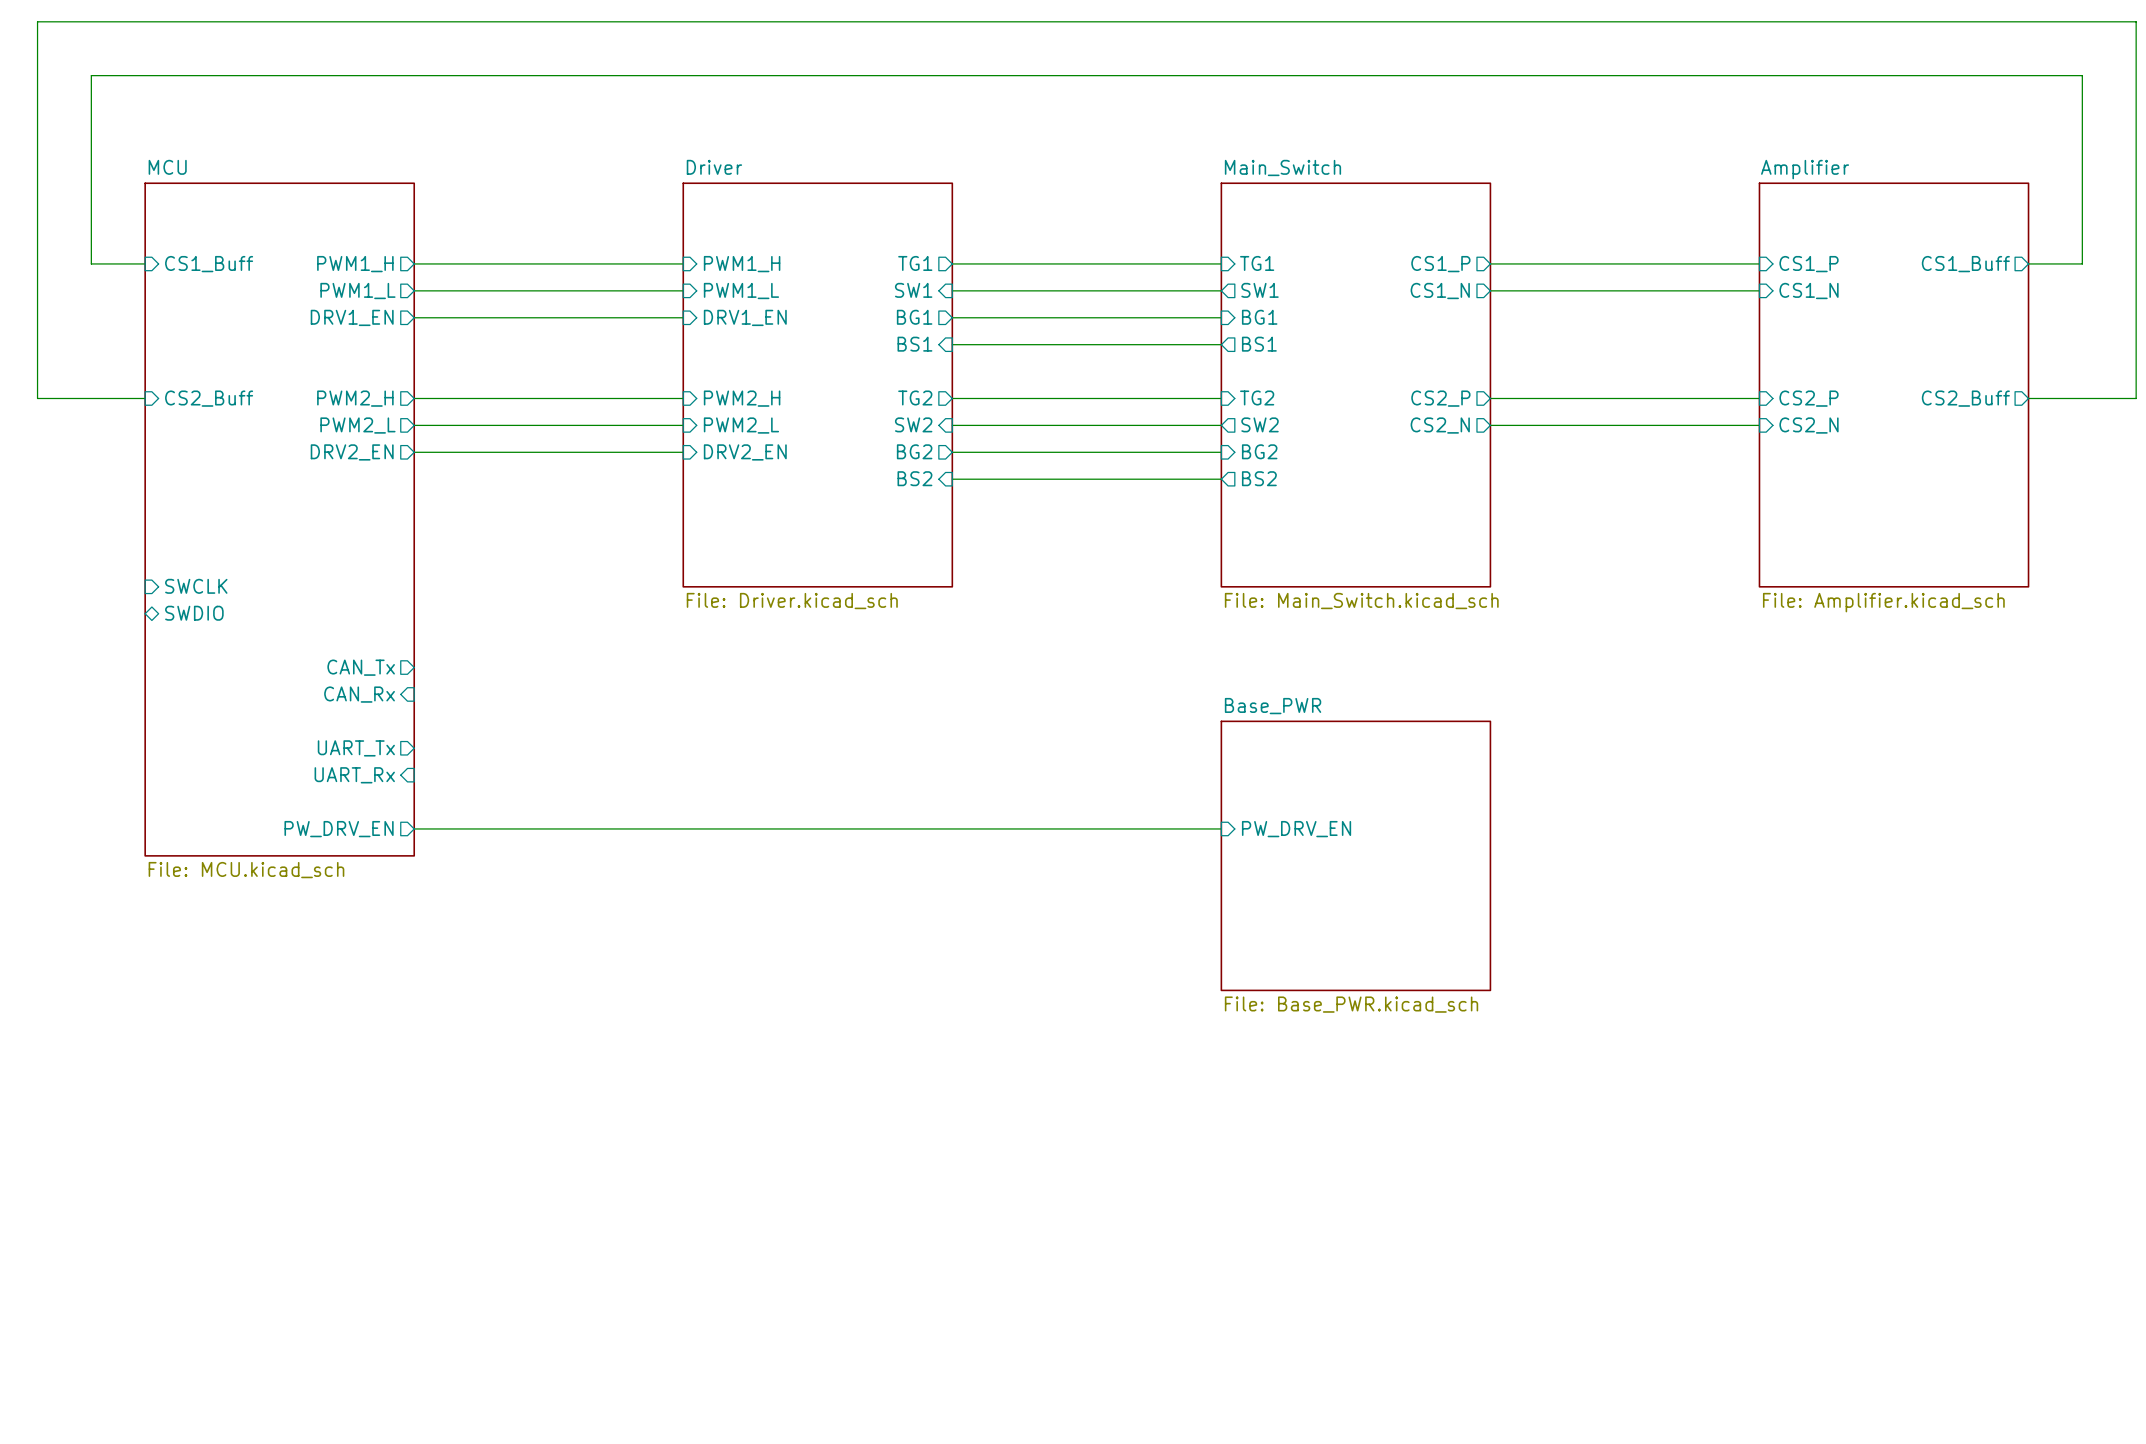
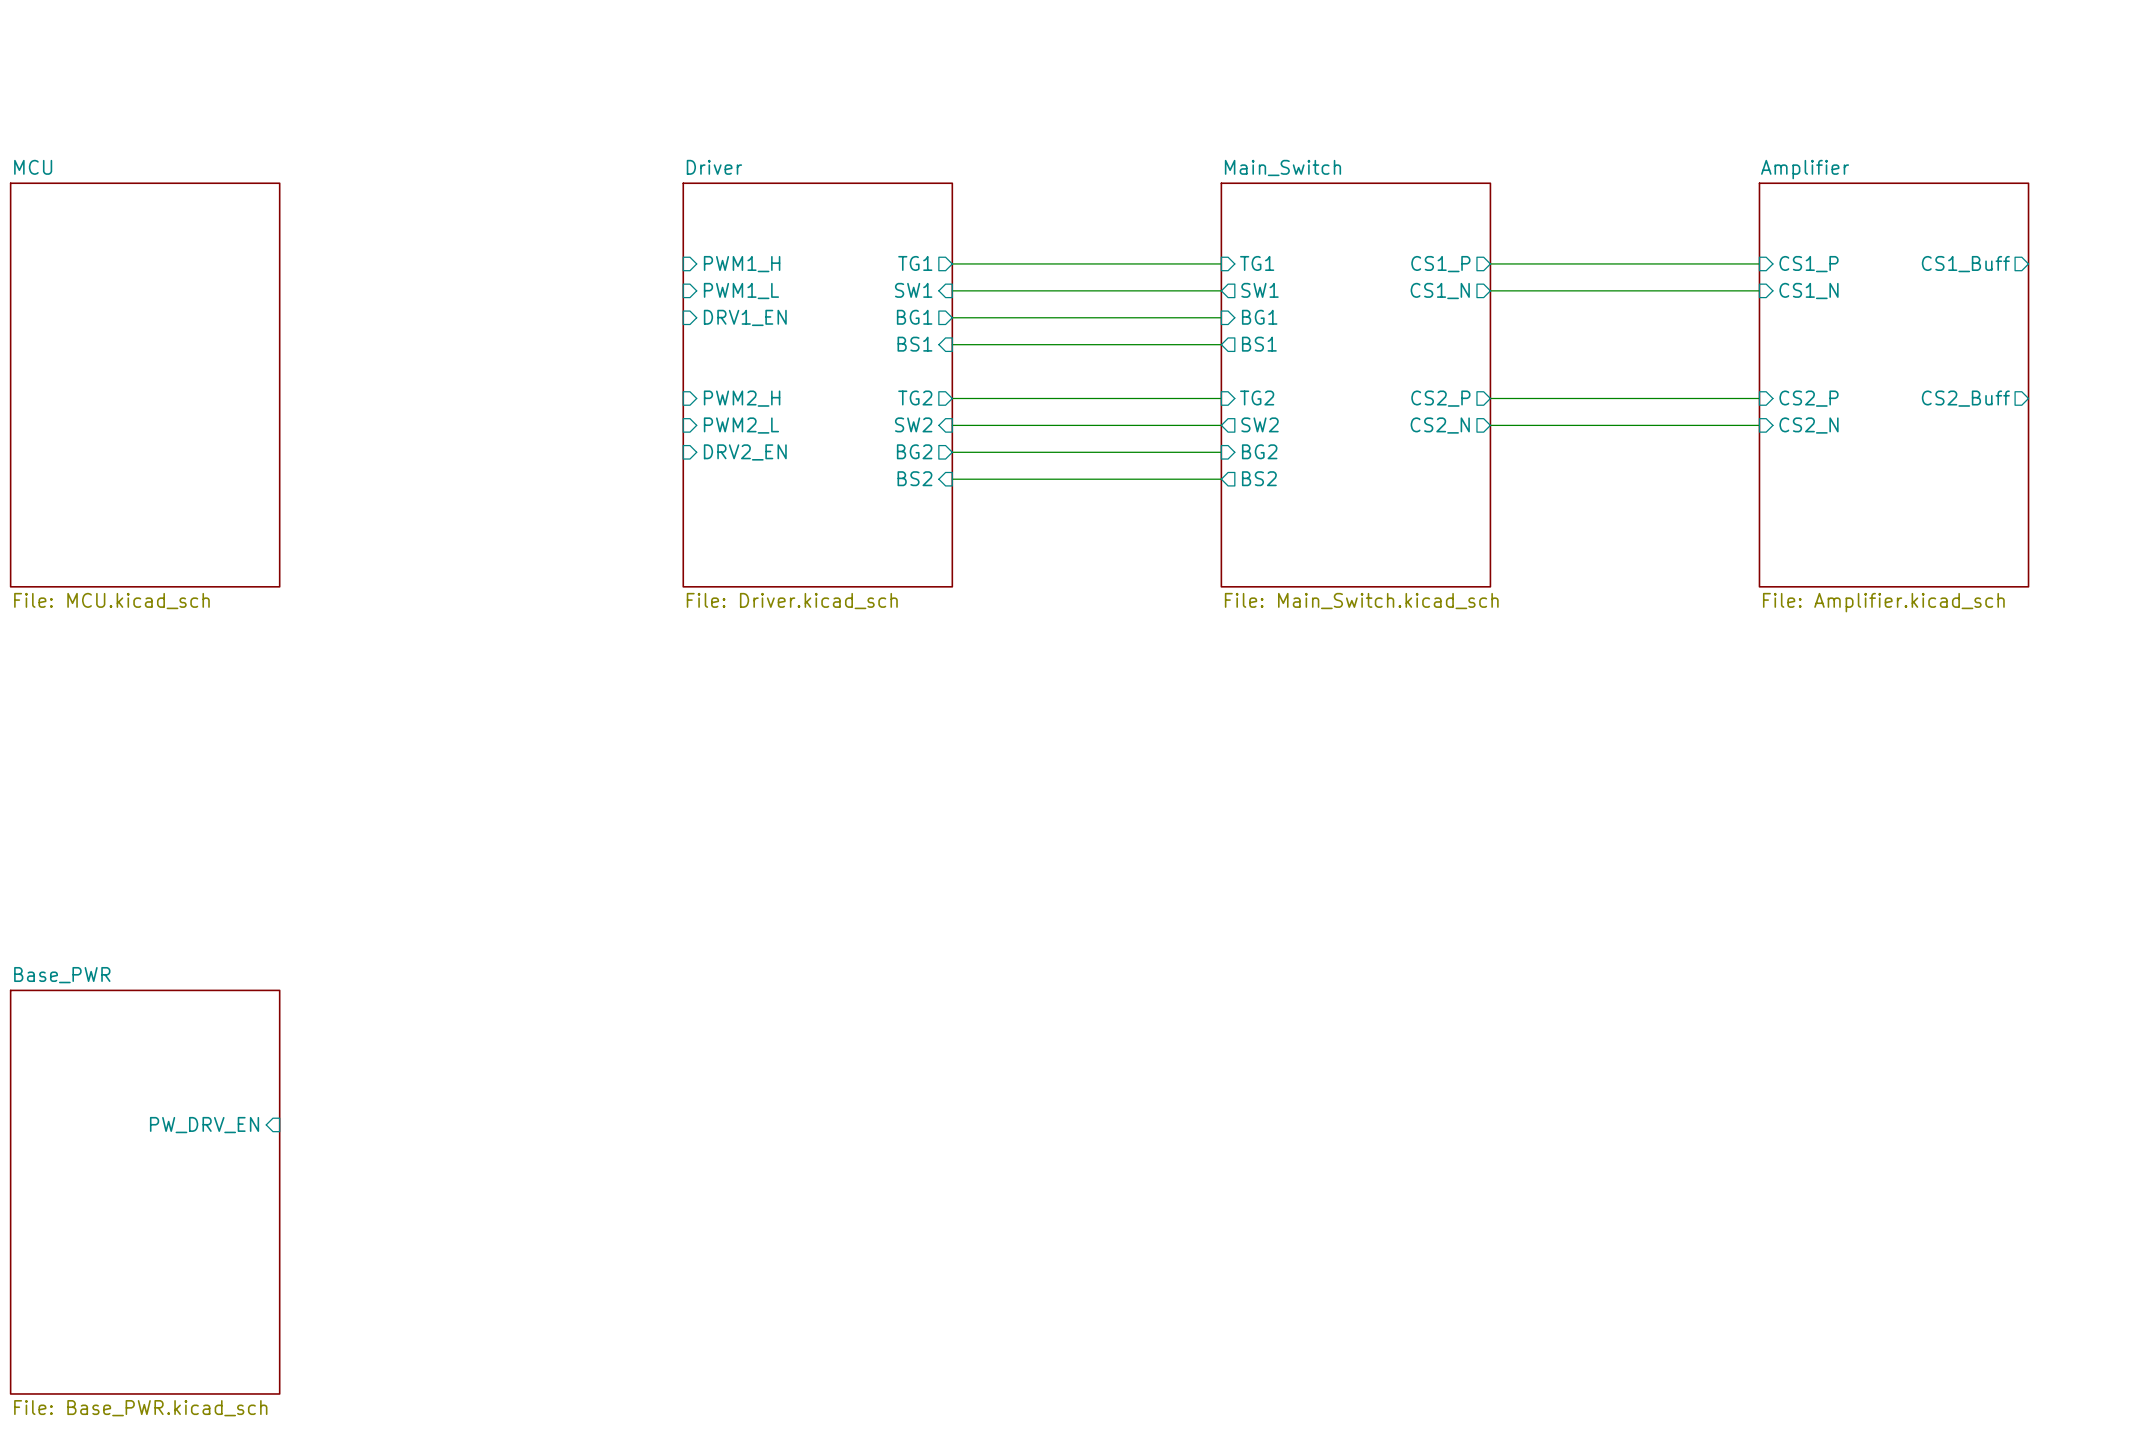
wire: (145, 263) (91, 263) (91, 75) (2082, 75) (2082, 263) (2028, 263) -> none
wire: (414, 263) (683, 263) -> none
sheet pin: CS1_Buff (209, 264) -> none
sheet pin: PWM1_H (355, 264) -> none
wire: (414, 290) (683, 290) -> none
sheet pin: PWM1_L (357, 291) -> none
sheet pin: DRV1_EN (352, 317) -> none
wire: (414, 317) (683, 317) -> none
sheet MCU: none -> File: MCU.kicad_sch (145, 385)
wire: (145, 398) (37, 398) (37, 21) (2136, 21) (2136, 398) (2028, 398) -> none
sheet pin: CS2_Buff (209, 398) -> none
sheet pin: PWM2_H (355, 398) -> none
wire: (414, 398) (683, 398) -> none
sheet pin: PWM2_L (357, 425) -> none
wire: (414, 425) (683, 425) -> none
sheet pin: DRV2_EN (352, 452) -> none
wire: (414, 452) (683, 452) -> none
sheet MCU: File: MCU.kicad_sch (279, 519) -> none
sheet pin: SWCLK (196, 586) -> none
sheet pin: SWDIO (194, 613) -> none
sheet pin: CAN_Tx (361, 667) -> none
sheet pin: CAN_Rx (359, 694) -> none
sheet pin: UART_Tx (356, 748) -> none
sheet pin: UART_Rx (354, 775) -> none
wire: (414, 828) (1221, 828) -> none
sheet pin: PW_DRV_EN (339, 829) -> none
sheet pin: PW_DRV_EN (1296, 829) -> none
sheet Base_PWR: File: Base_PWR.kicad_sch (1355, 855) -> none
sheet pin: none -> PW_DRV_EN (204, 1125)
sheet Base_PWR: none -> File: Base_PWR.kicad_sch (145, 1192)

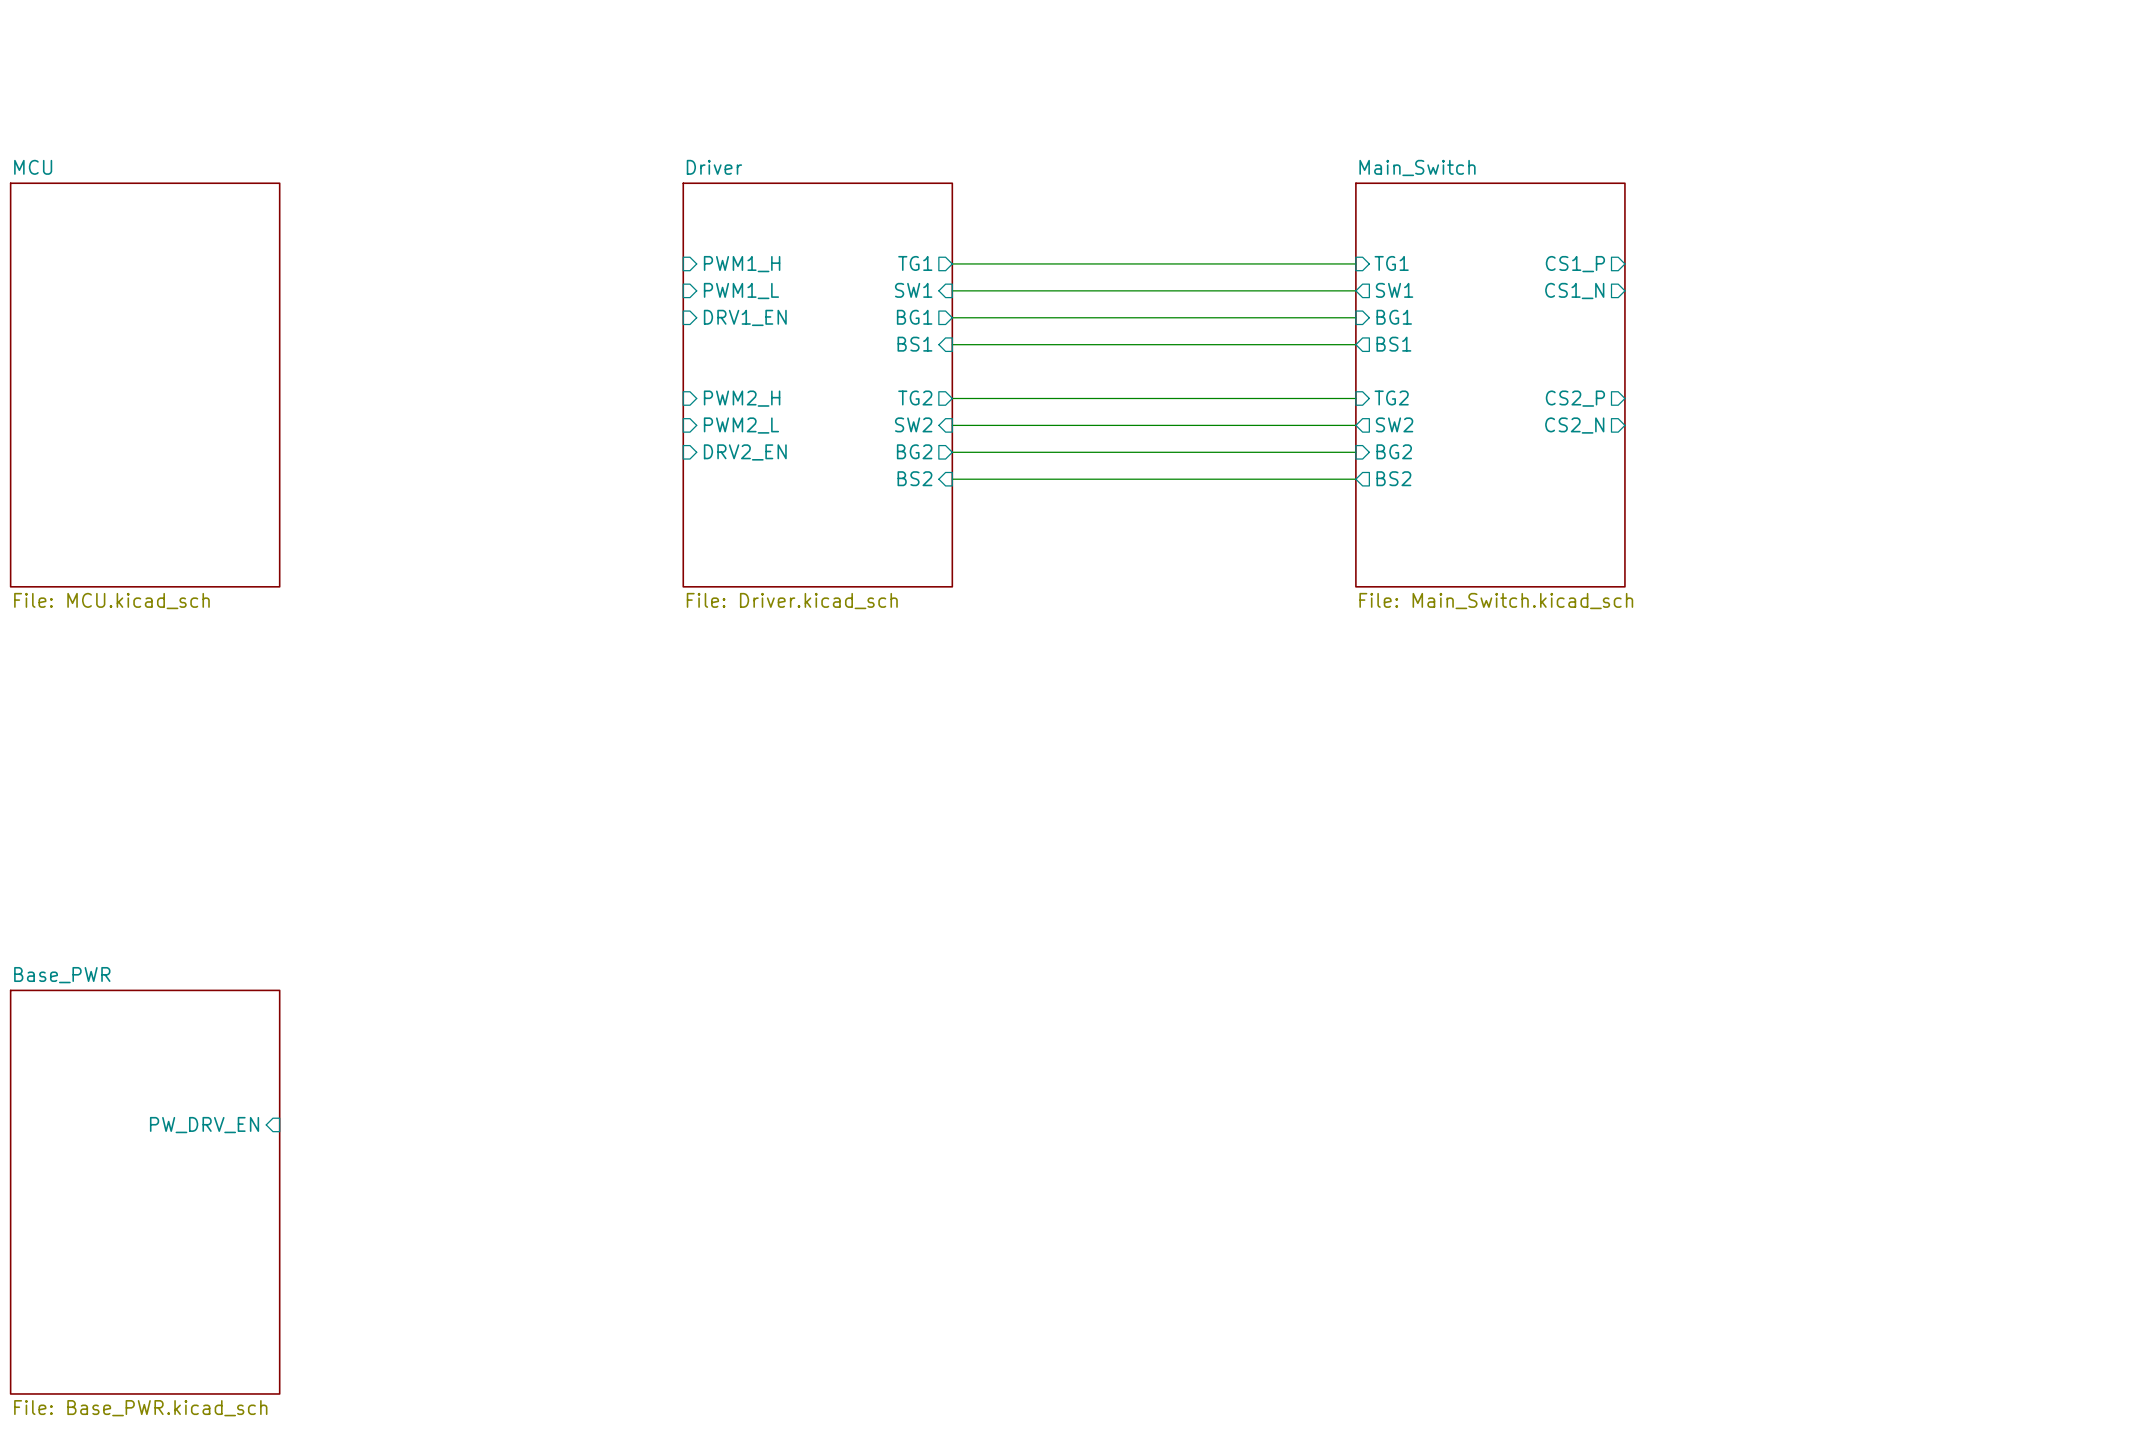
wire: none -> (1221, 263) (1355, 263)
sheet pin position: TG1 (1257, 263) -> TG1 (1391, 263)
wire: (1490, 263) (1759, 263) -> none
sheet pin: CS1_P (1440, 264) -> none
sheet pin: none -> CS1_P (1575, 264)
sheet pin: CS1_P (1809, 264) -> none
sheet pin: CS1_Buff (1965, 264) -> none
wire: none -> (1221, 290) (1355, 290)
sheet pin position: SW1 (1260, 290) -> SW1 (1394, 290)
wire: (1490, 290) (1759, 290) -> none
sheet pin: CS1_N (1440, 291) -> none
sheet pin: none -> CS1_N (1574, 291)
sheet pin: CS1_N (1809, 291) -> none
wire: none -> (1221, 317) (1355, 317)
sheet pin position: BG1 (1259, 317) -> BG1 (1394, 317)
wire: none -> (1221, 344) (1355, 344)
sheet pin position: BS1 (1259, 344) -> BS1 (1393, 344)
sheet Main_Switch position: (1355, 385) -> (1490, 385)
sheet Amplifier: File: Amplifier.kicad_sch (1894, 385) -> none
sheet pin position: TG2 (1257, 397) -> TG2 (1391, 397)
wire: none -> (1221, 398) (1355, 398)
sheet pin: CS2_P (1440, 398) -> none
wire: (1490, 398) (1759, 398) -> none
sheet pin: none -> CS2_P (1575, 398)
sheet pin: CS2_P (1809, 398) -> none
sheet pin: CS2_Buff (1965, 398) -> none
sheet pin position: SW2 (1260, 424) -> SW2 (1394, 424)
wire: none -> (1221, 425) (1355, 425)
sheet pin: CS2_N (1440, 425) -> none
wire: (1490, 425) (1759, 425) -> none
sheet pin: none -> CS2_N (1574, 425)
sheet pin: CS2_N (1809, 425) -> none
sheet pin position: BG2 (1259, 451) -> BG2 (1394, 451)
wire: none -> (1221, 452) (1355, 452)
sheet pin position: BS2 (1259, 478) -> BS2 (1393, 478)
wire: none -> (1221, 479) (1355, 479)

